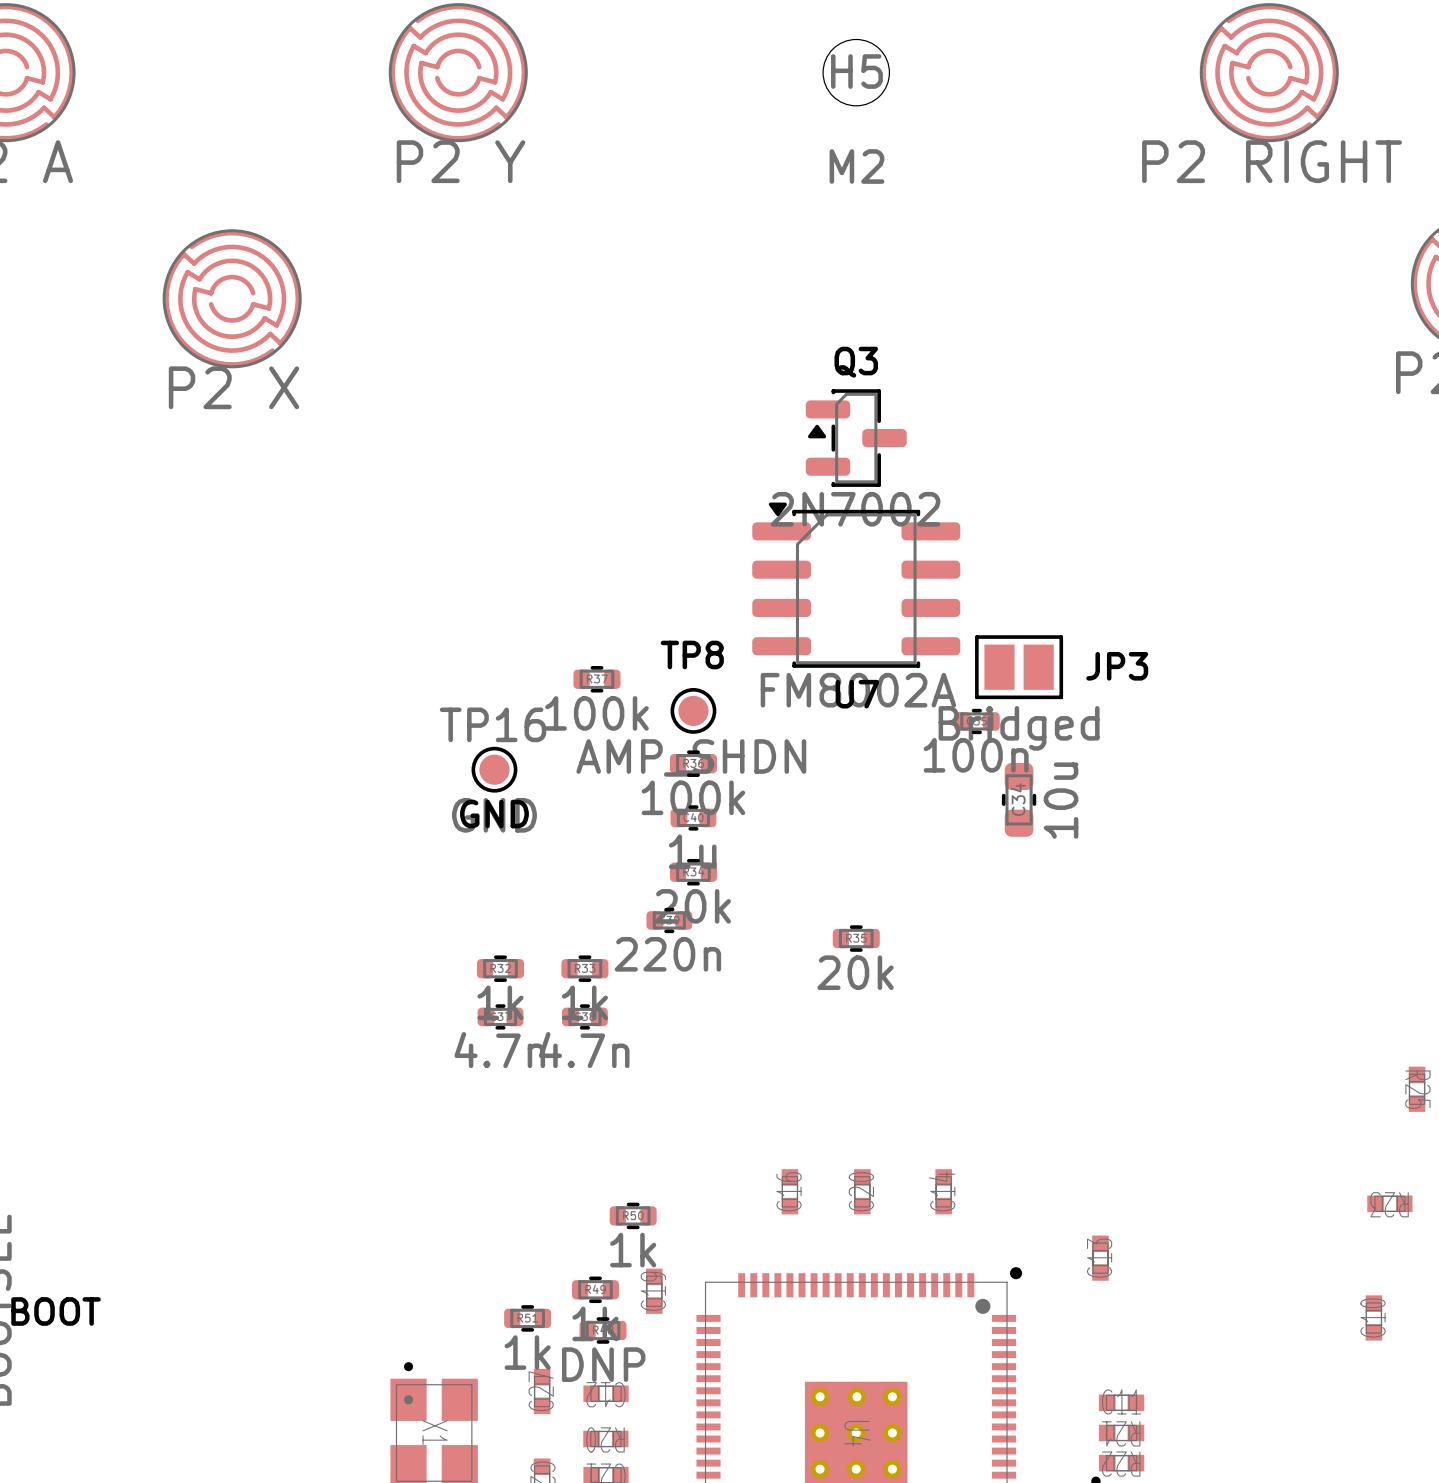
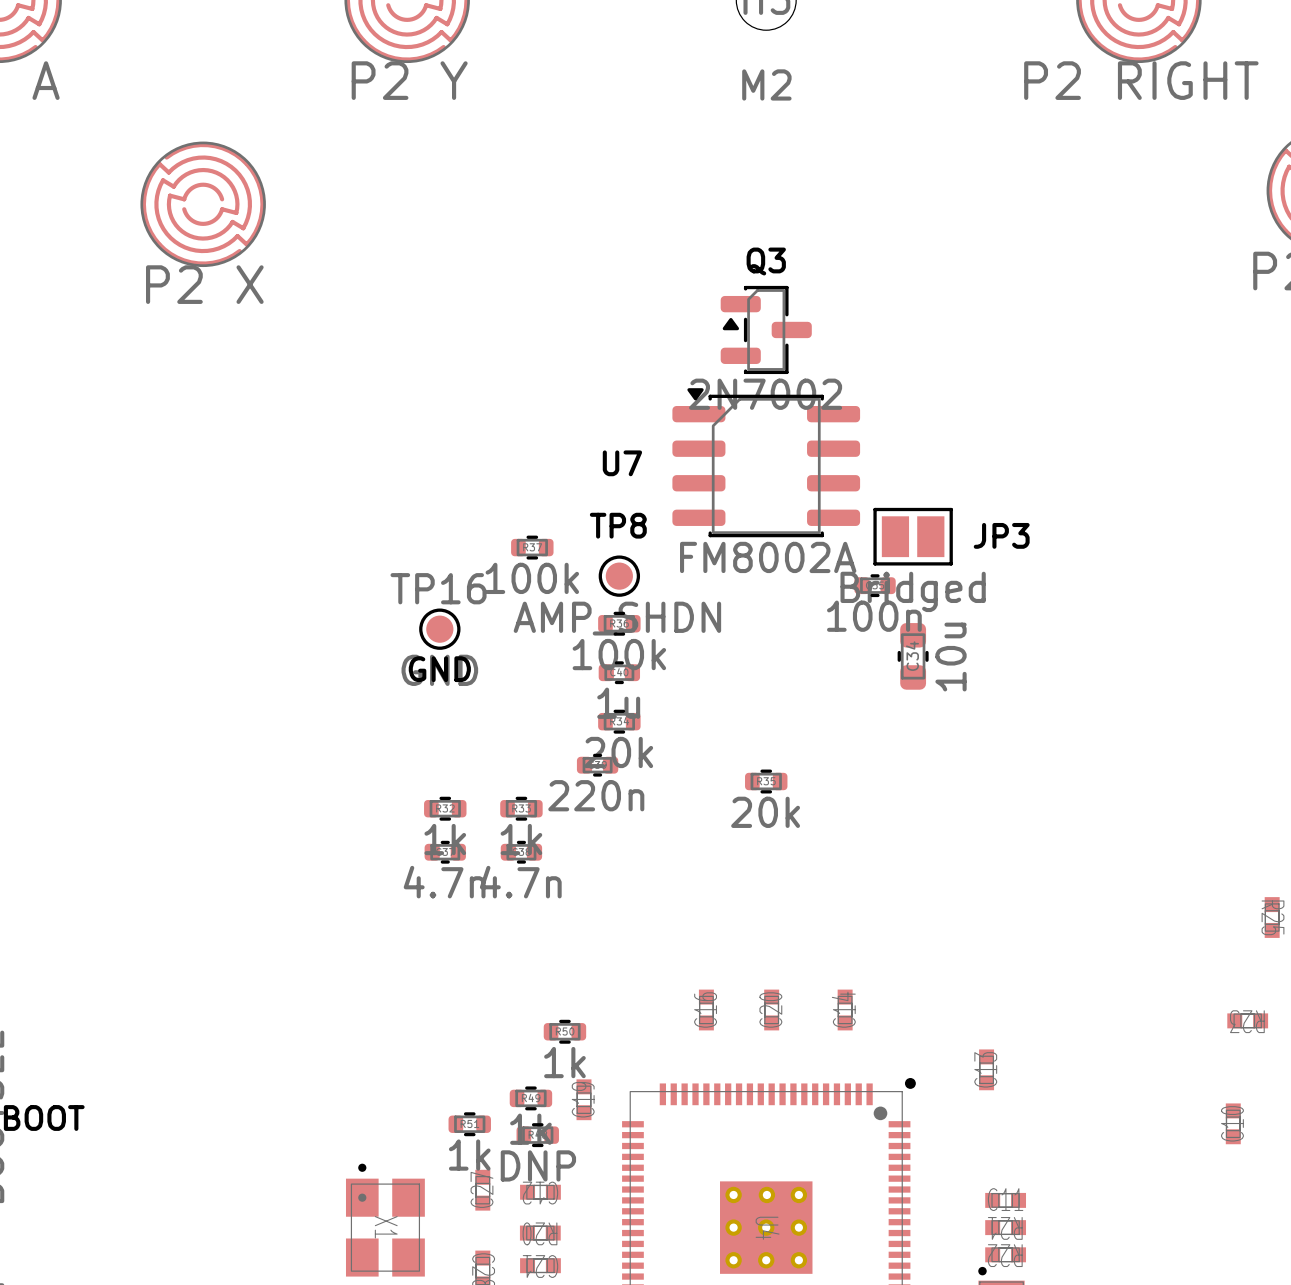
U7 name position: U7 (857, 694) -> U7 (622, 463)

